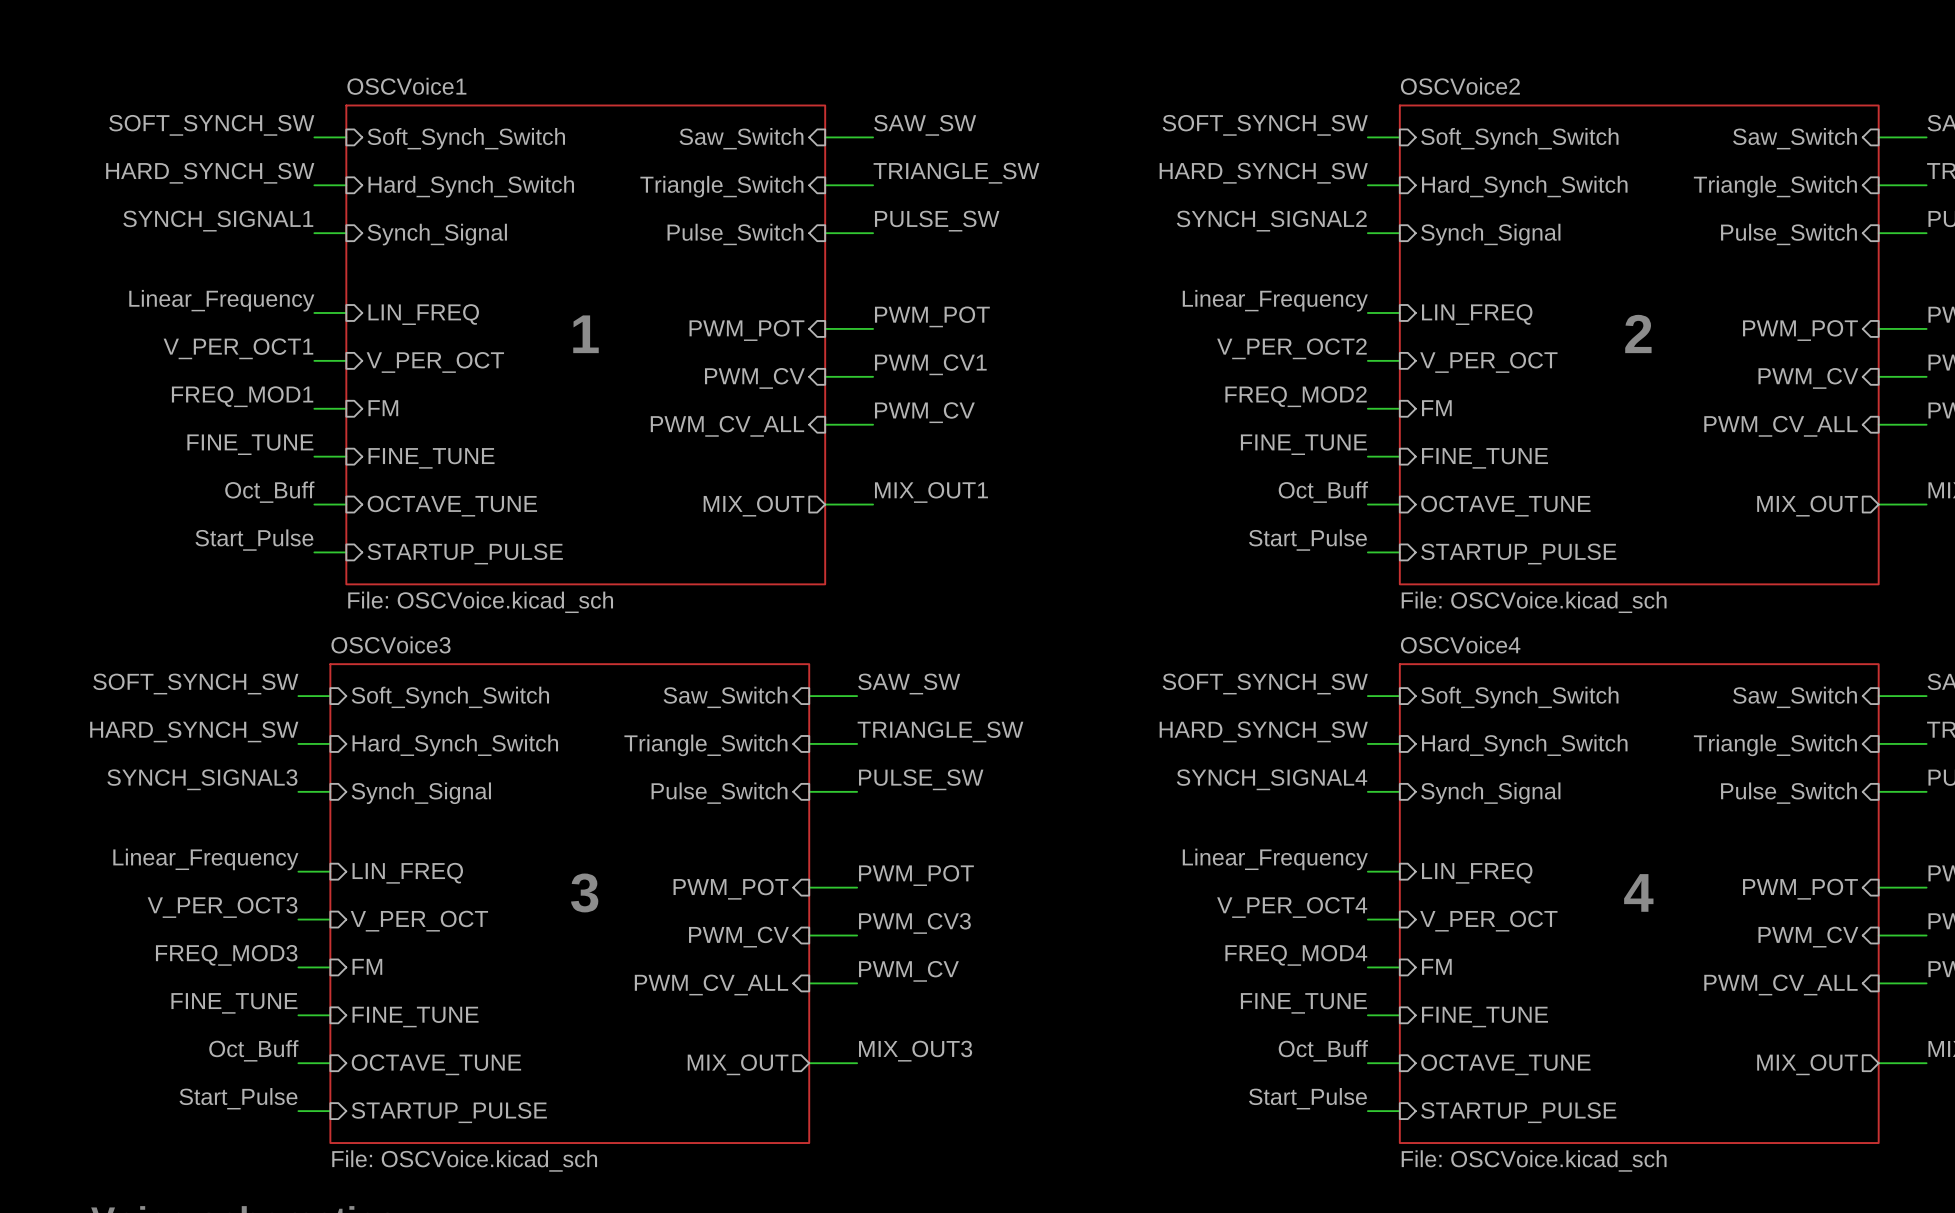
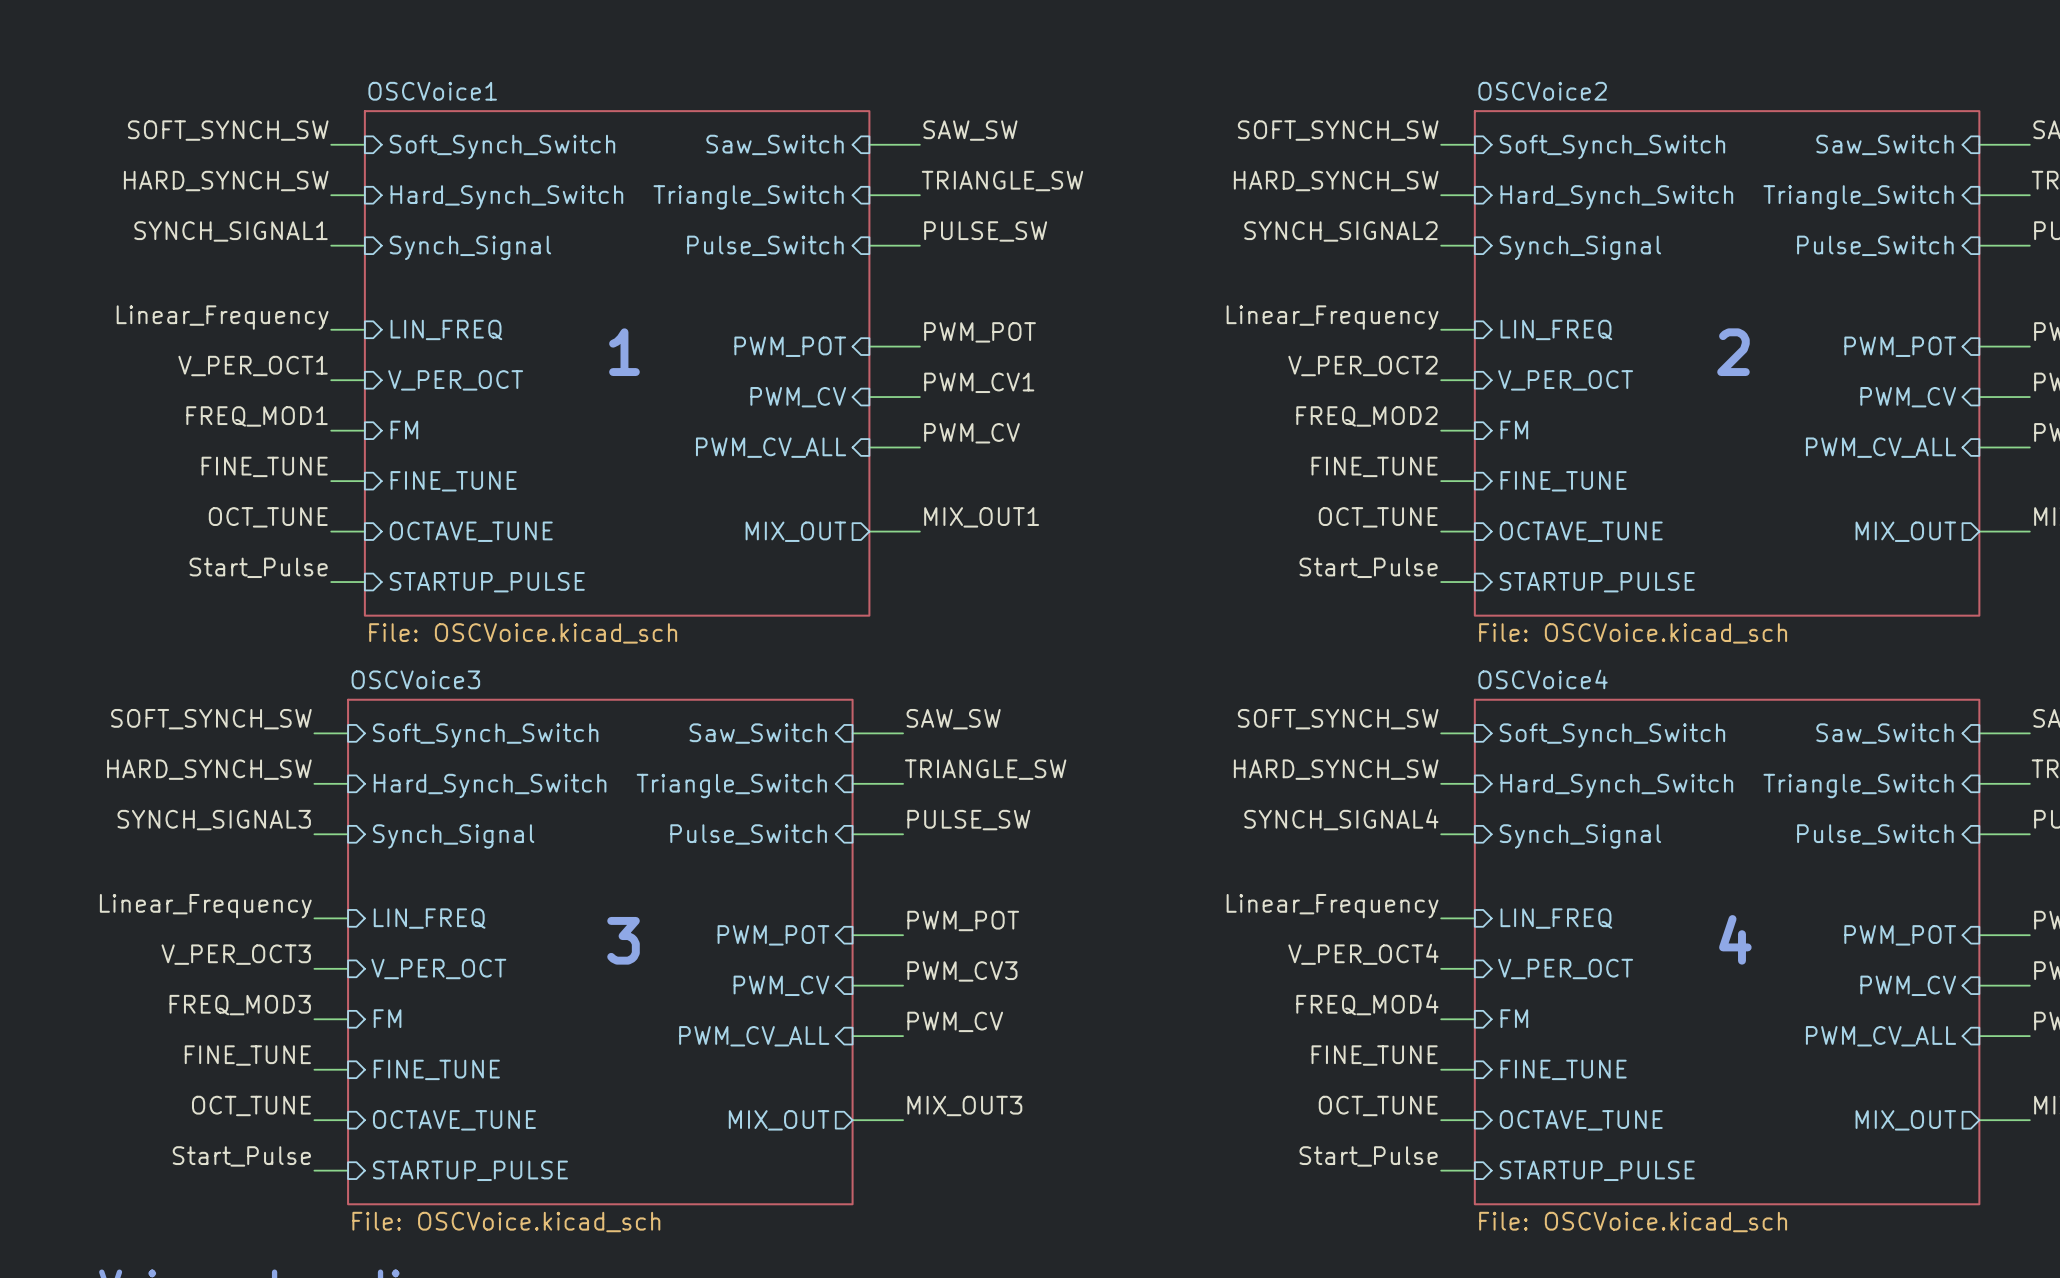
label: Oct_Buff (269, 492) -> OCT_TUNE (268, 517)
label: Oct_Buff (1323, 492) -> OCT_TUNE (1378, 517)
label: Oct_Buff (253, 1050) -> OCT_TUNE (251, 1105)
label: Oct_Buff (1323, 1050) -> OCT_TUNE (1378, 1105)

